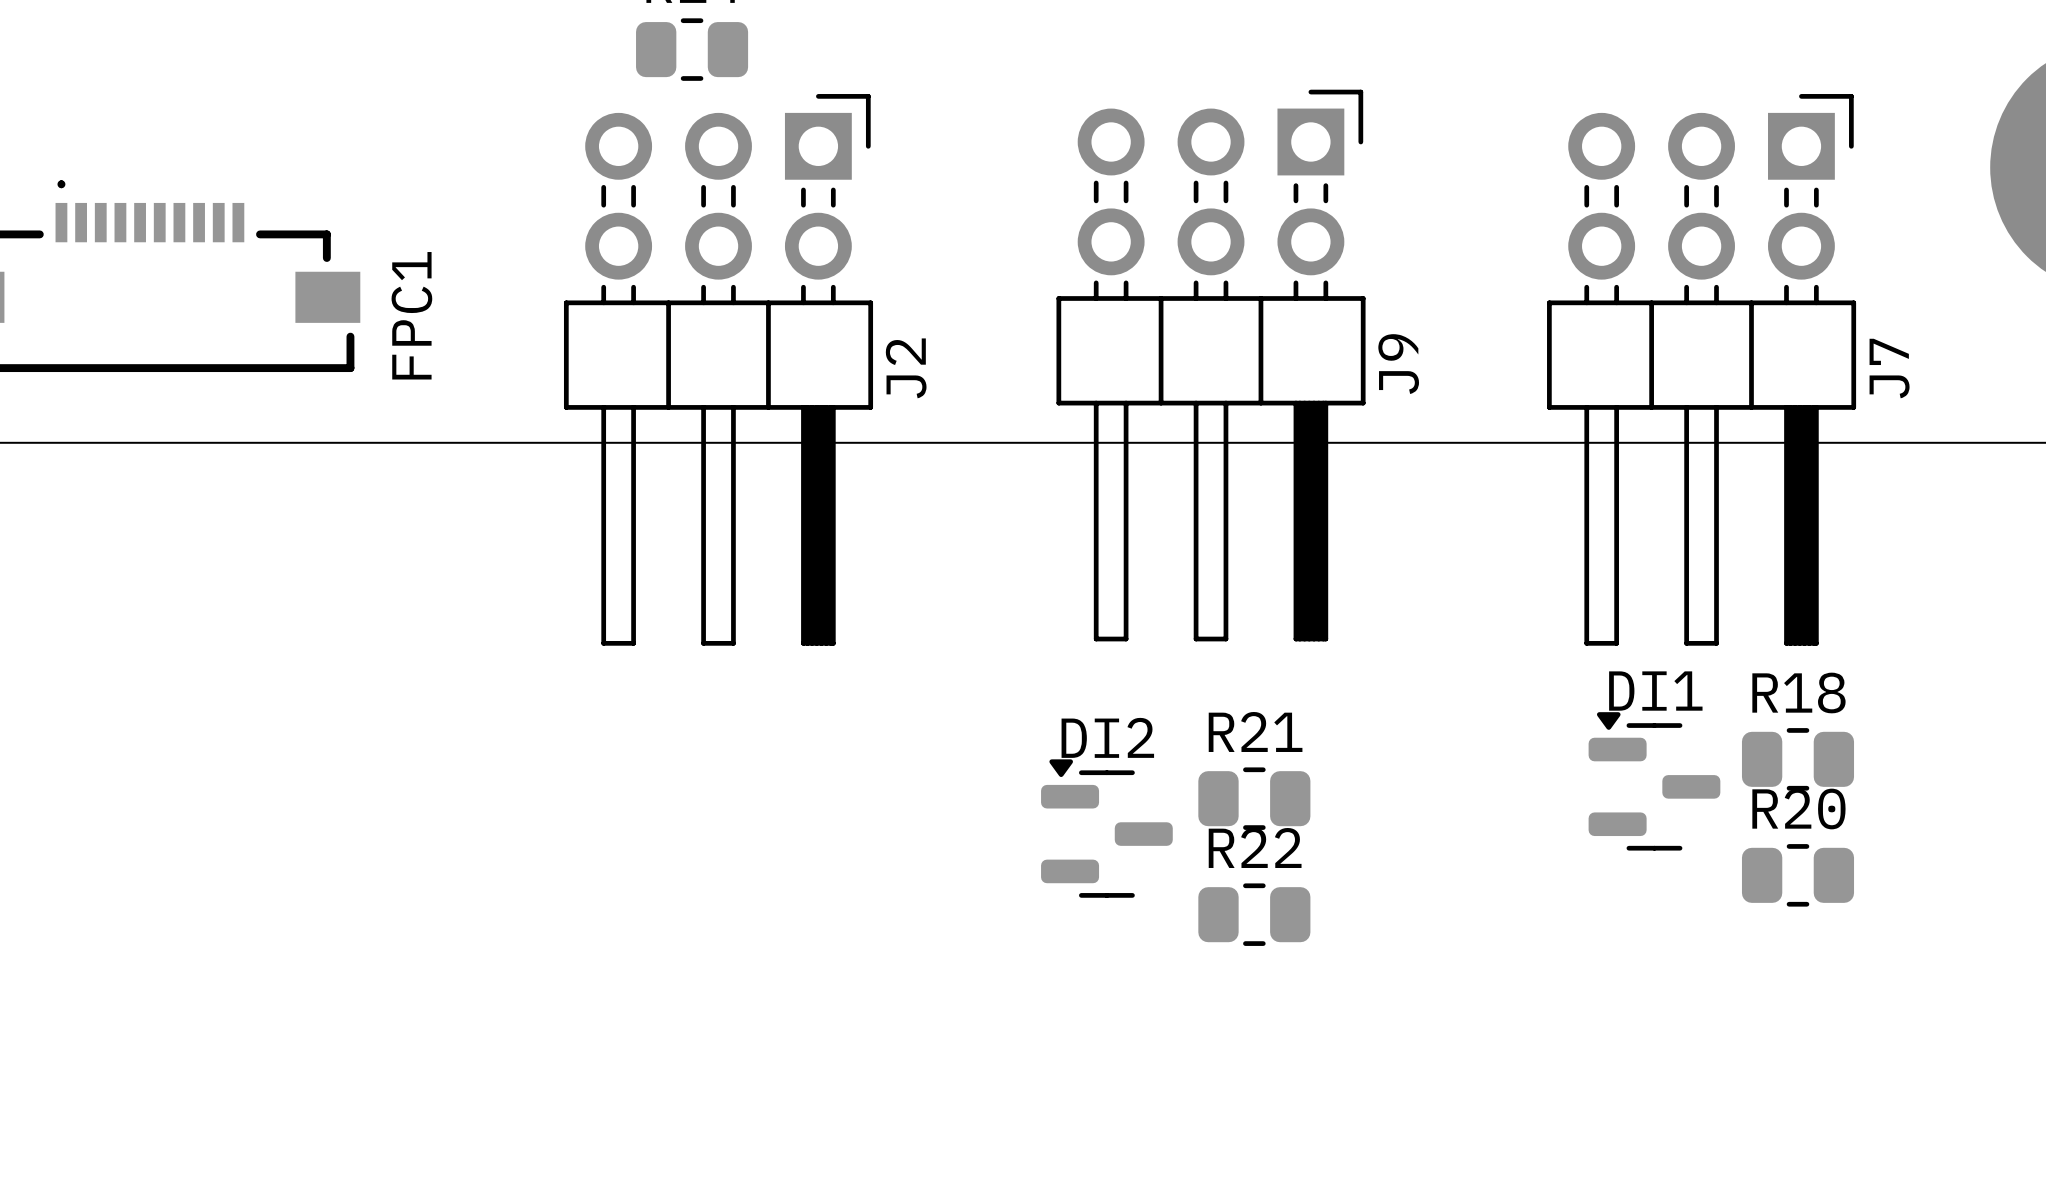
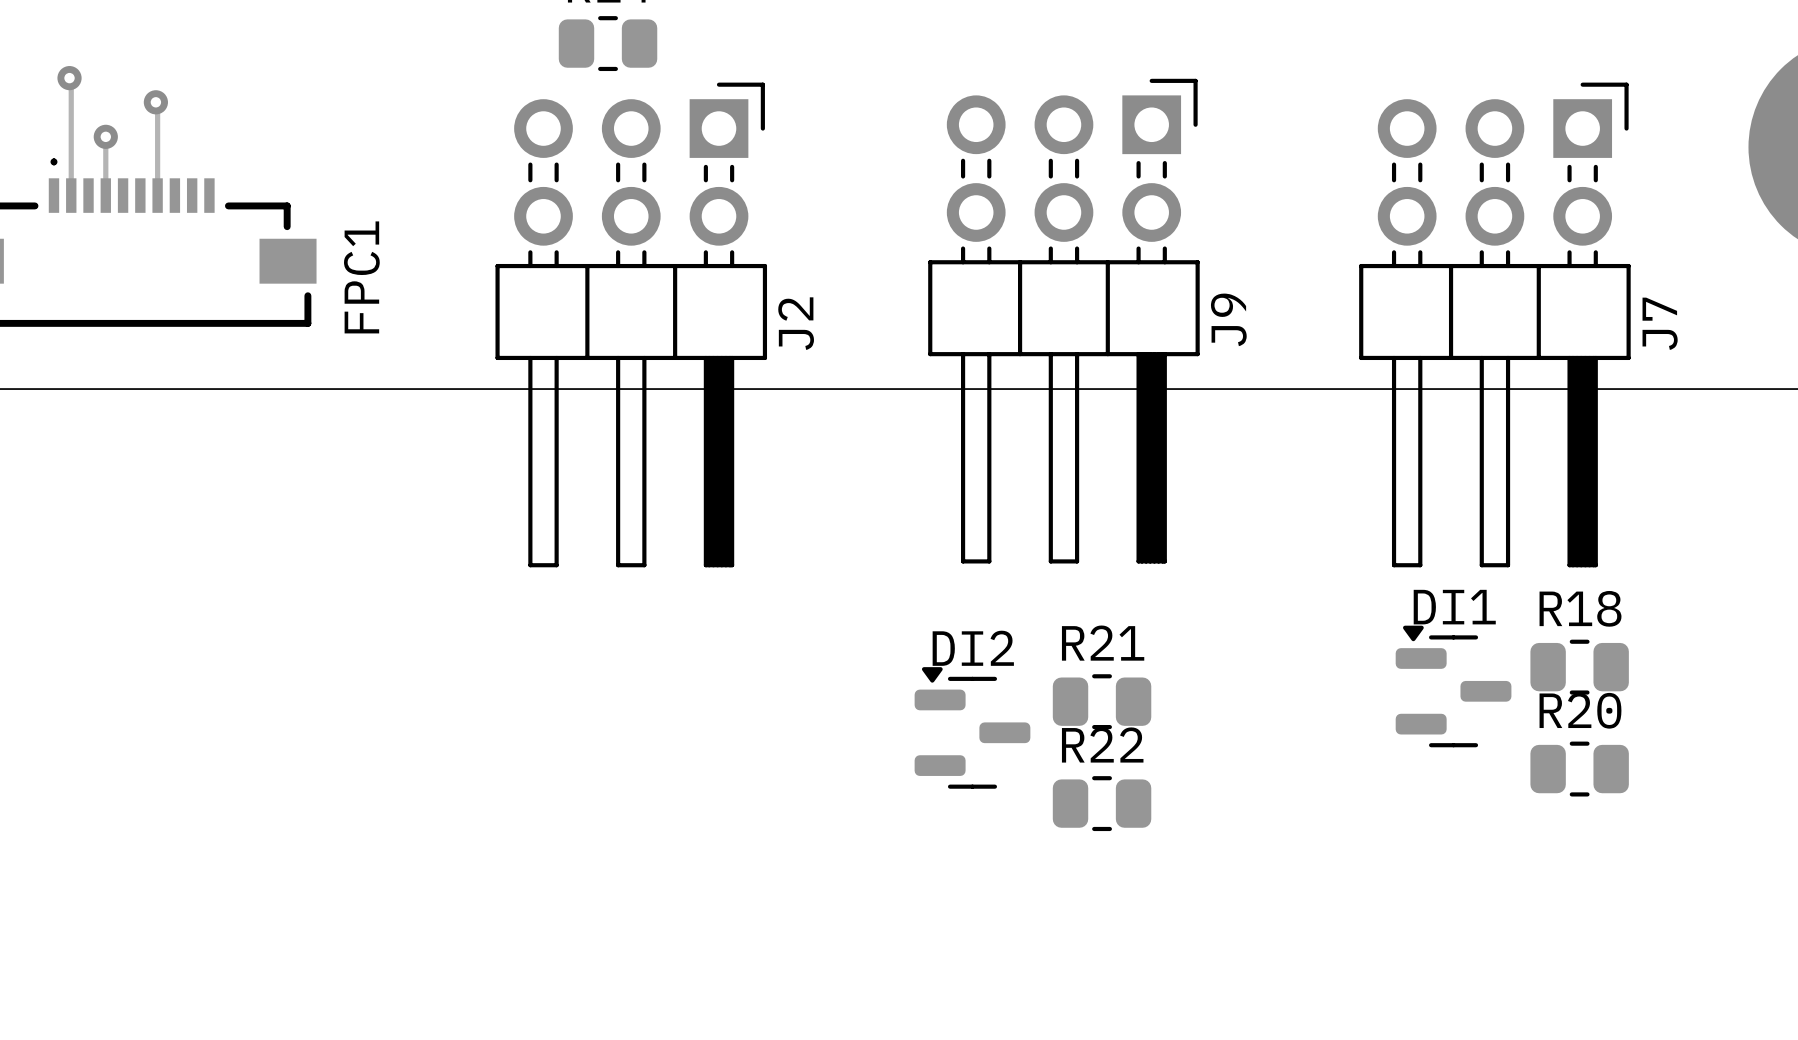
track: none -> (69, 78) (71, 79) (71, 195)
via: none -> (69, 78)
track: none -> (155, 102) (157, 104) (157, 195)
via: none -> (155, 102)
track: none -> (105, 136) (105, 195)
via: none -> (105, 136)

